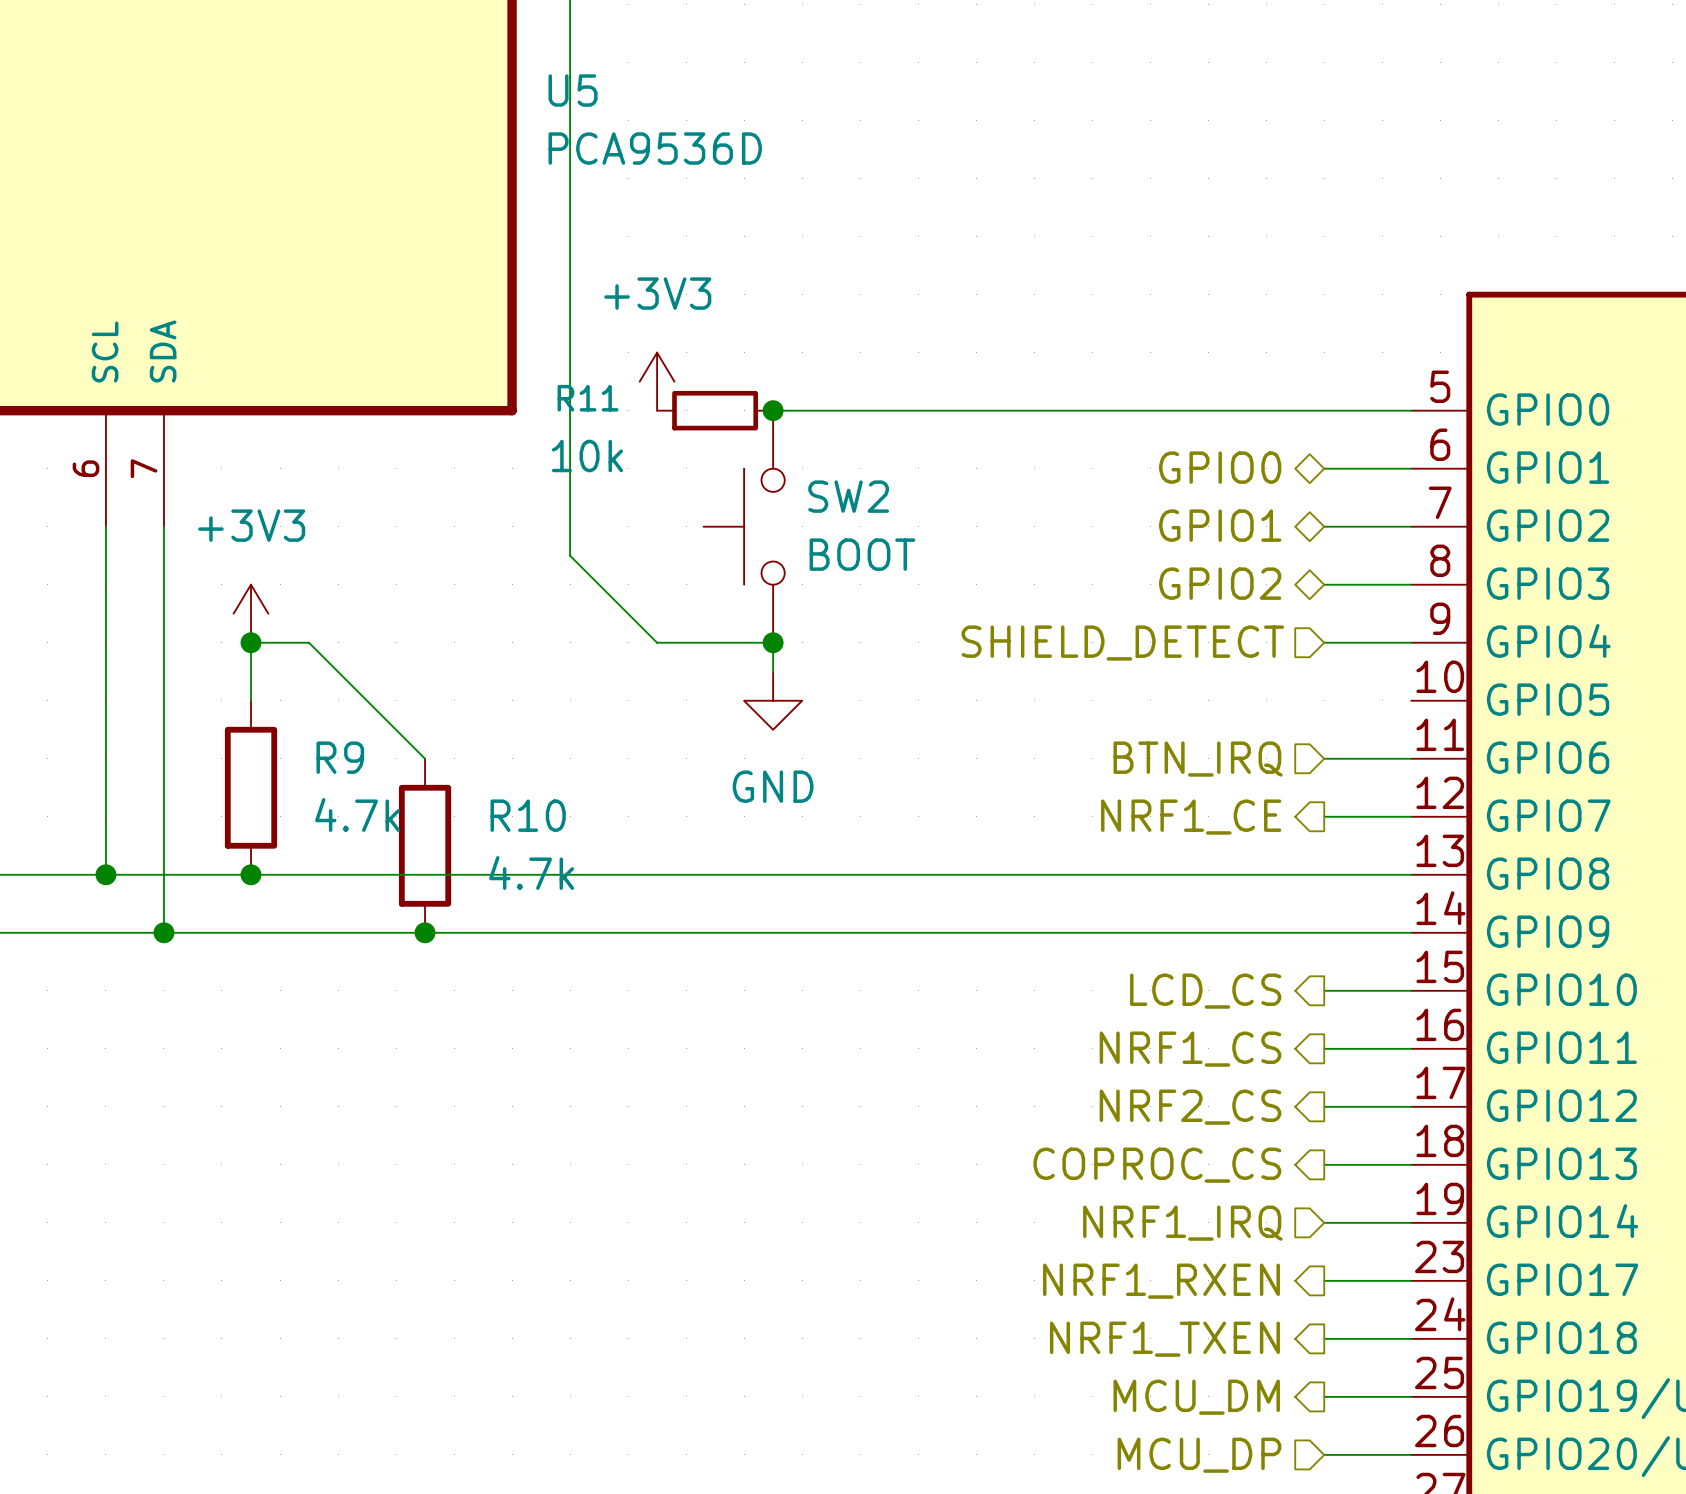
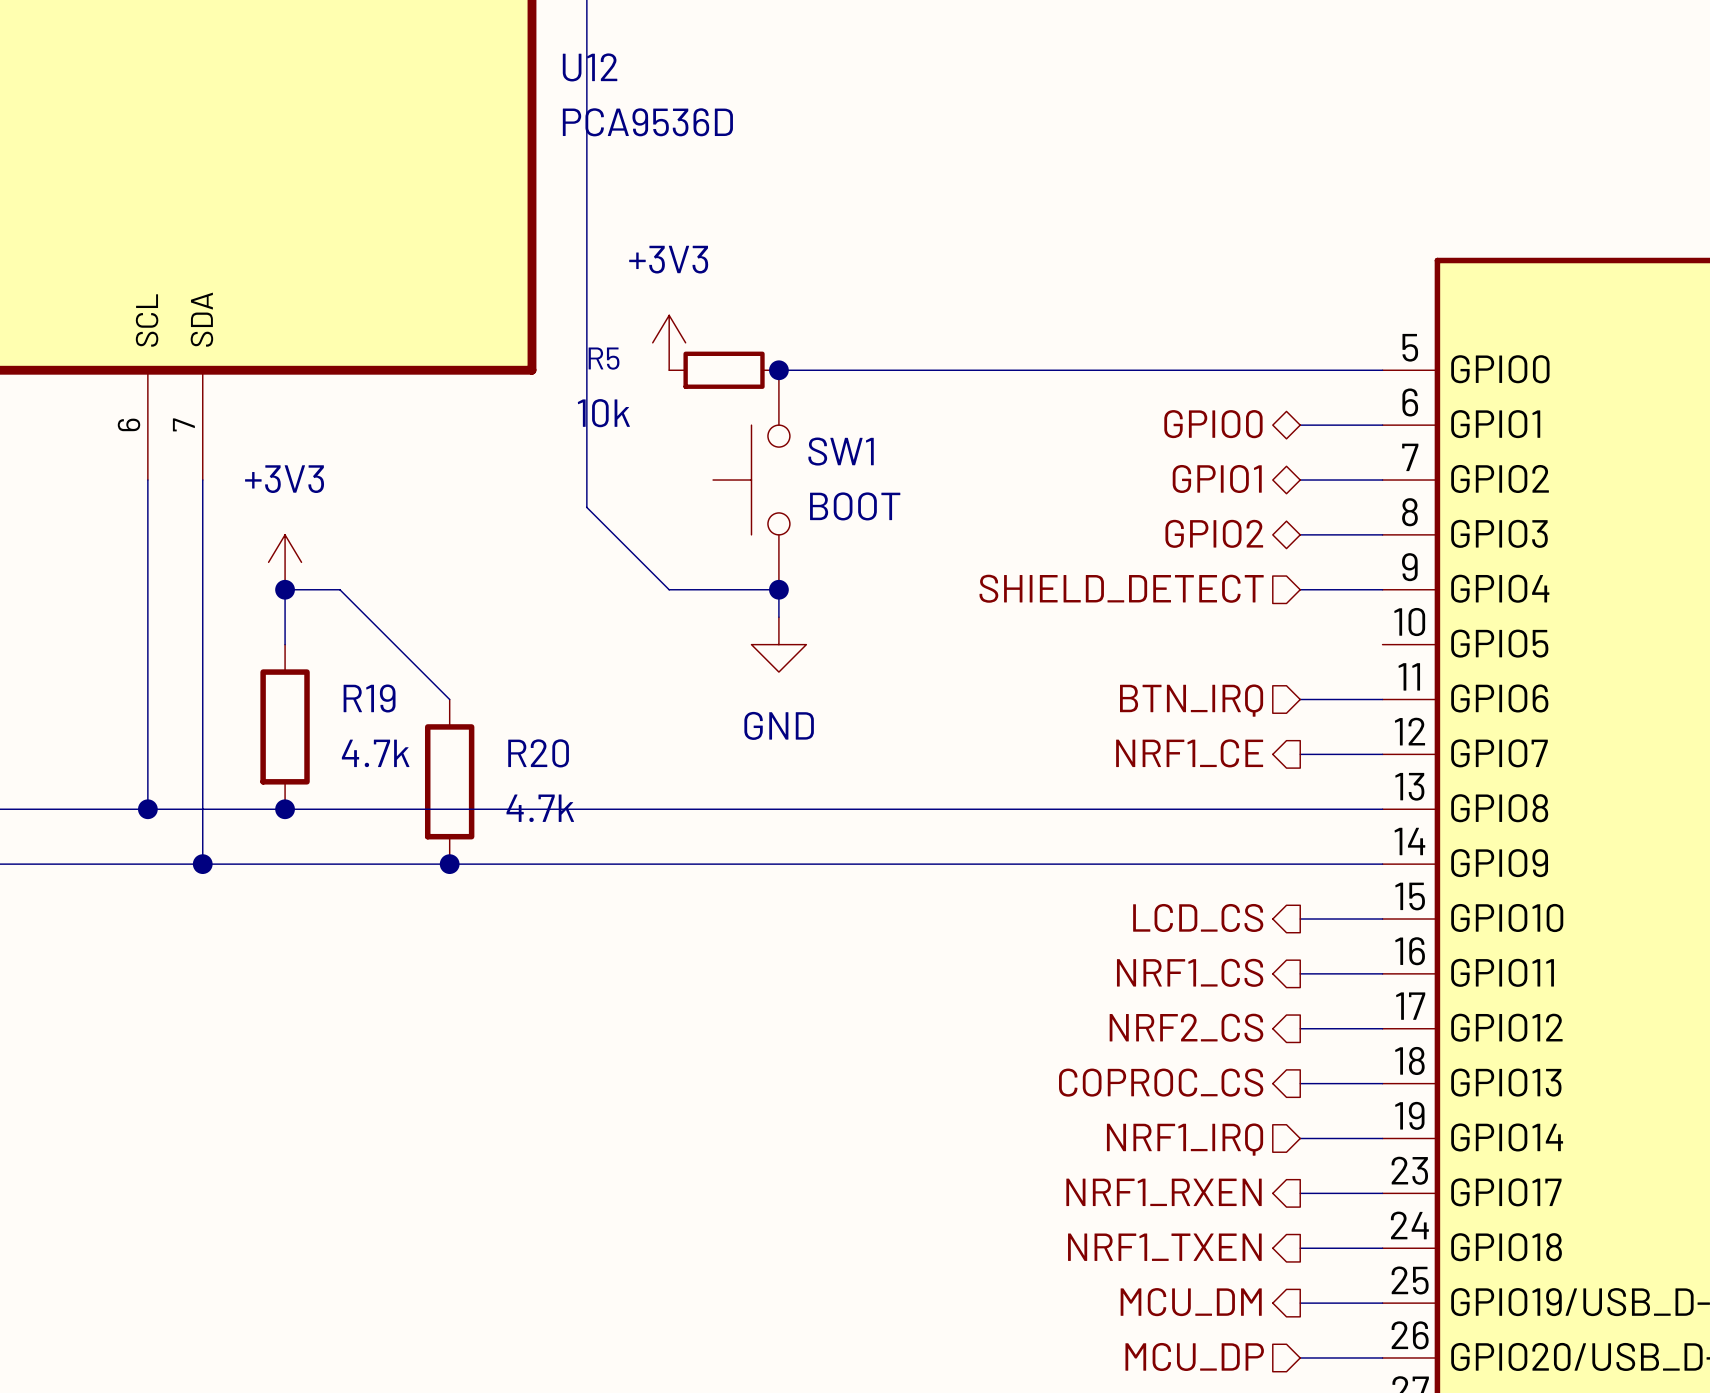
U5 name: U5 (573, 90) -> U12 (590, 67)
R11 name: R11 (588, 398) -> R5 (604, 358)
SW2 name: SW2 (848, 496) -> SW1 (841, 451)
R9 name: R9 (340, 757) -> R19 (369, 698)
R10 name: R10 (528, 815) -> R20 (538, 753)

